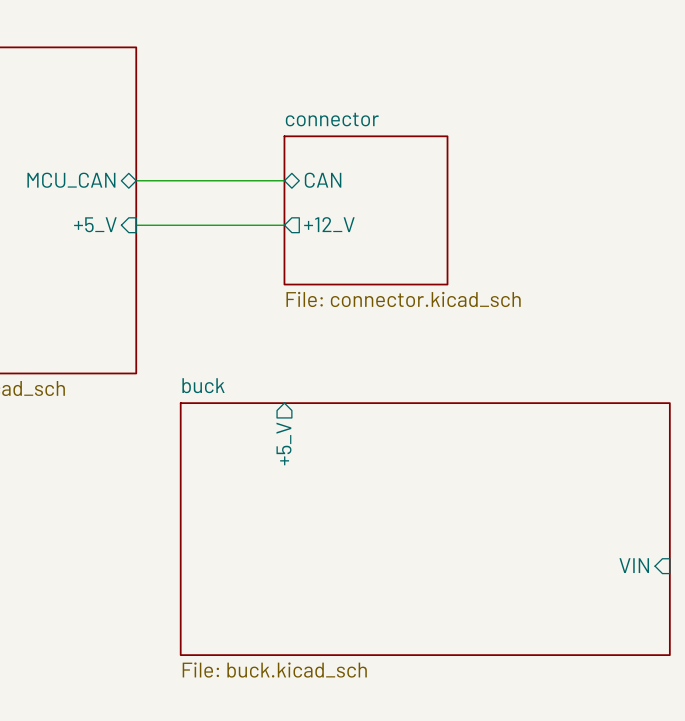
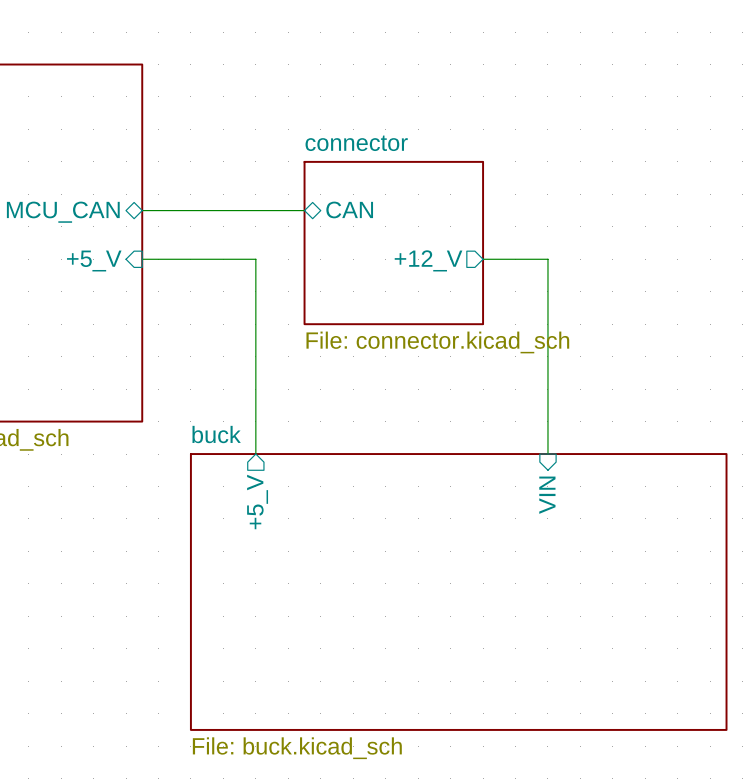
sheet pin rotation: 0° (329, 224) -> 180° (428, 260)
wire: (239, 225) (284, 225) -> (255, 259) (255, 454)
wire: none -> (483, 259) (547, 259) (547, 454)
sheet pin position: +5_V (283, 443) -> +5_V (257, 501)
sheet pin rotation: 0° (634, 565) -> 90° counterclockwise (547, 495)
sheet pin position: VIN (634, 565) -> VIN (547, 495)

